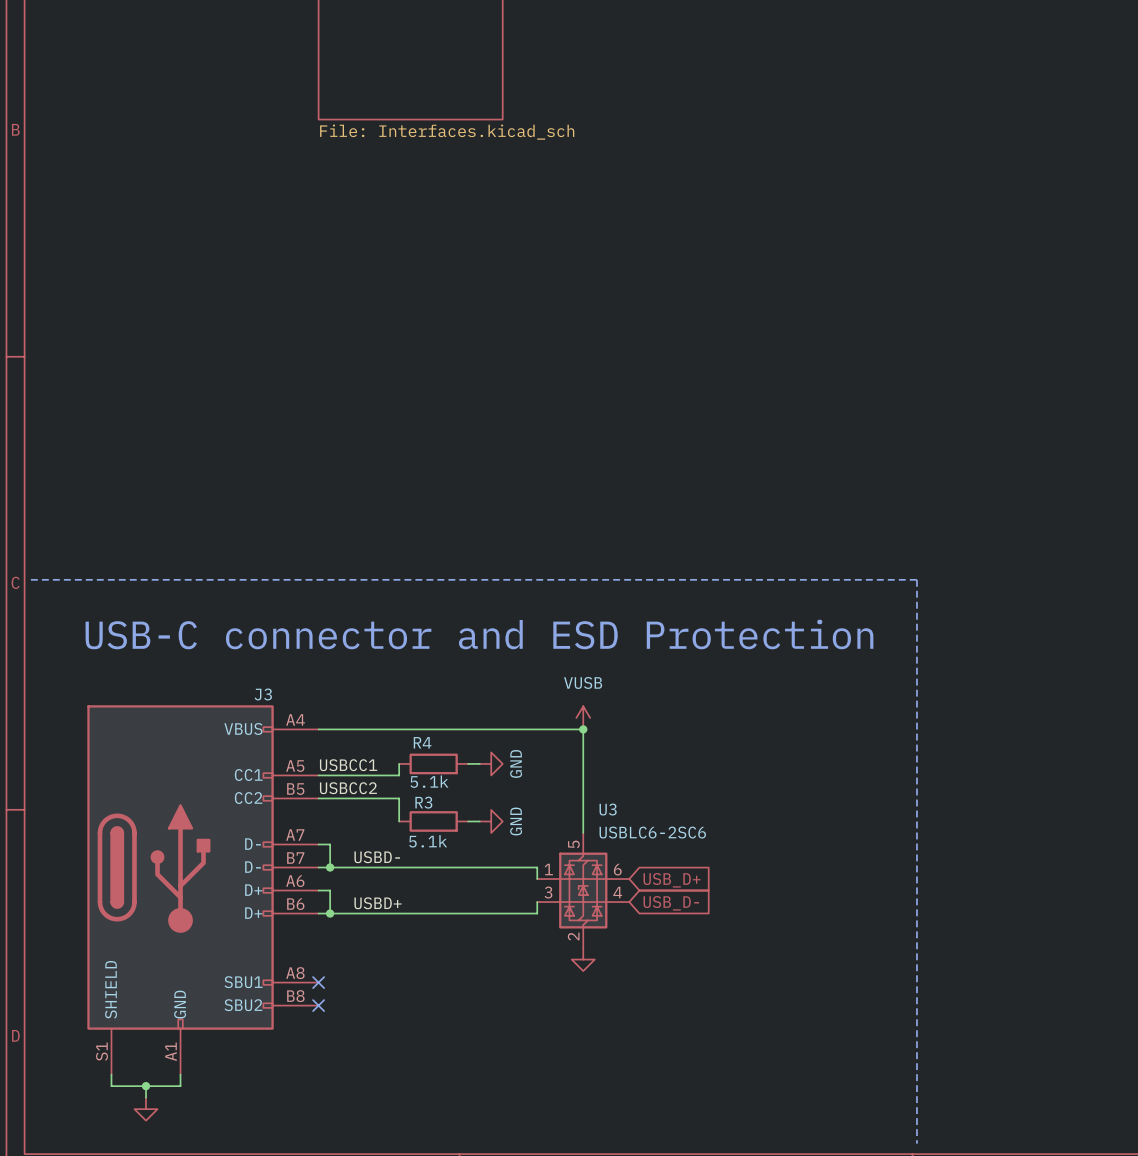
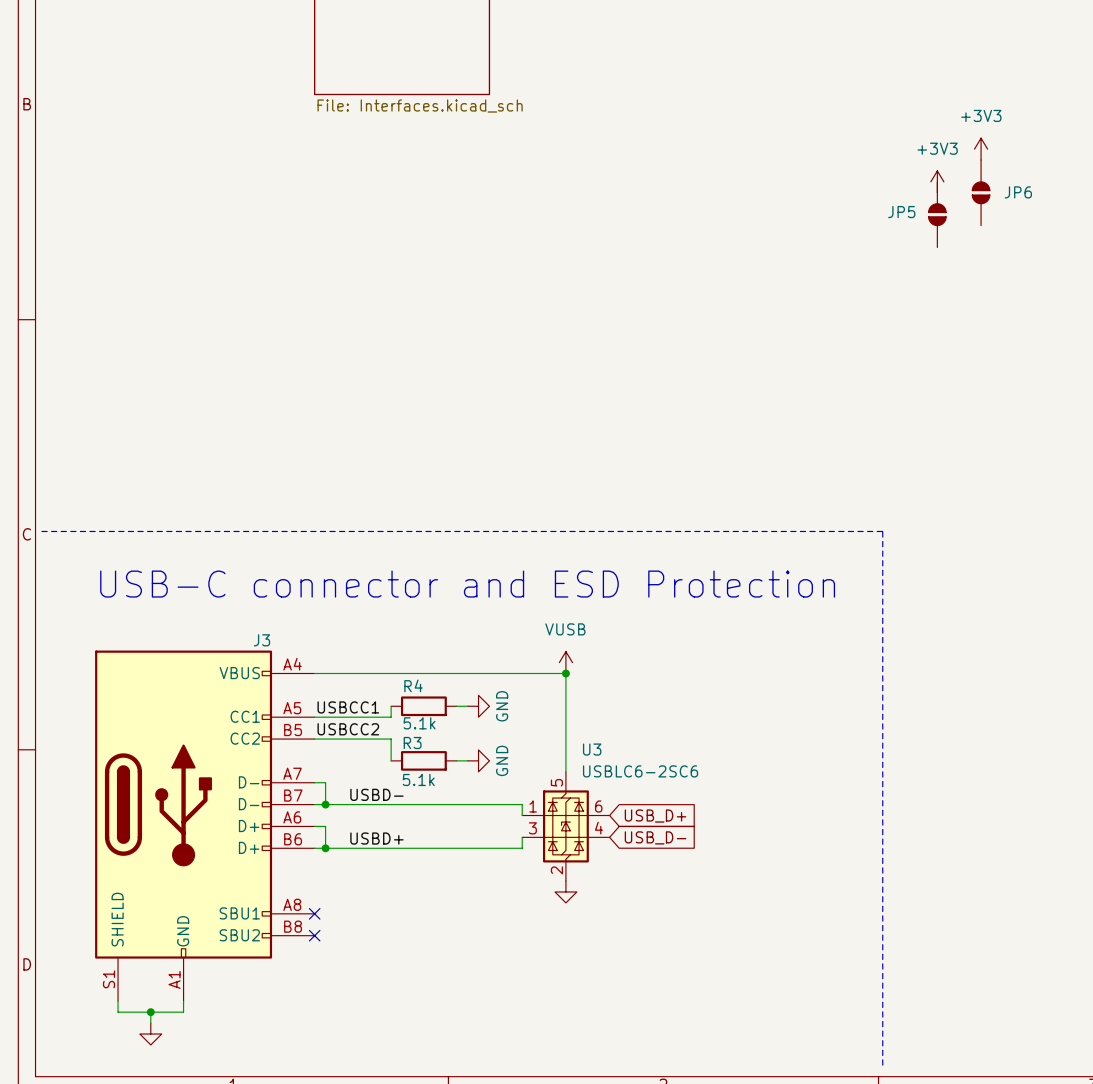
power symbol: none -> +3V3 (981, 149)
power symbol: none -> +3V3 (937, 181)
JP6: none -> (981, 192)
JP5: none -> (937, 214)

